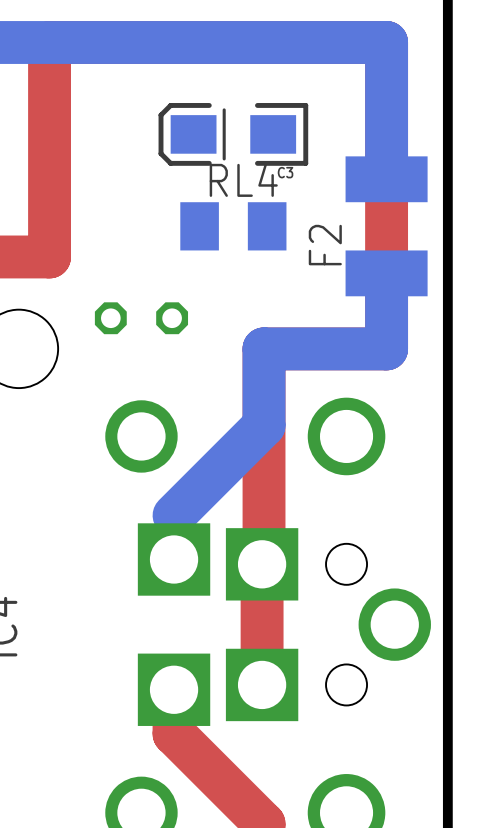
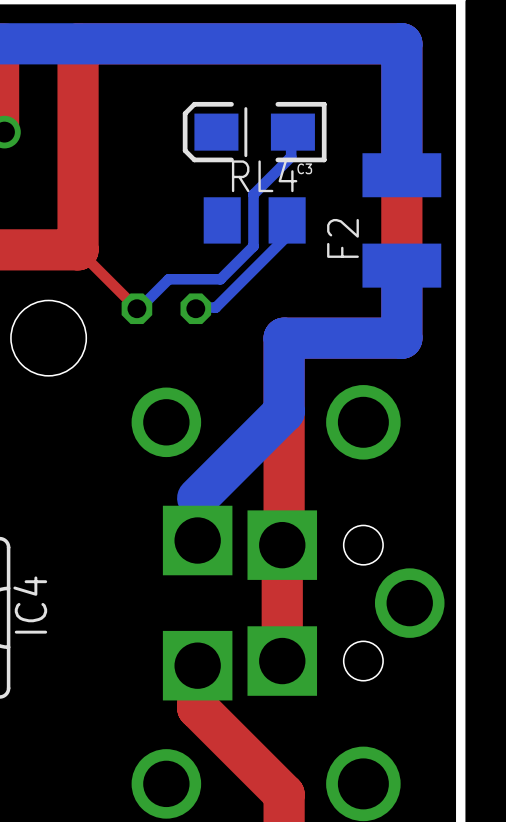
bottom track: none -> (292, 132) (291, 133) (291, 156) (253, 194) (253, 246) (220, 279) (168, 279) (140, 307) (136, 308)
bottom track: none -> (287, 220) (286, 236) (215, 307) (195, 308)
top track: none -> (78, 249) (136, 308)

